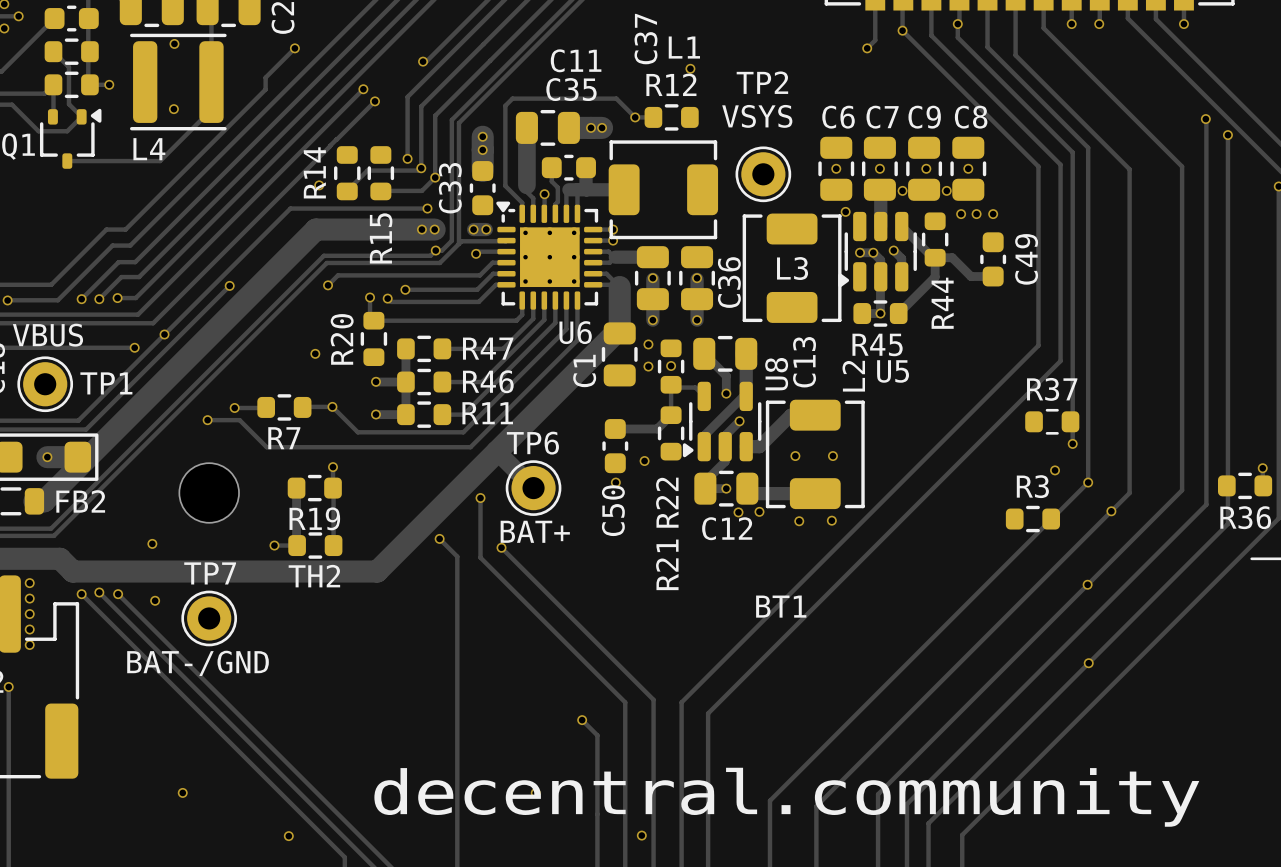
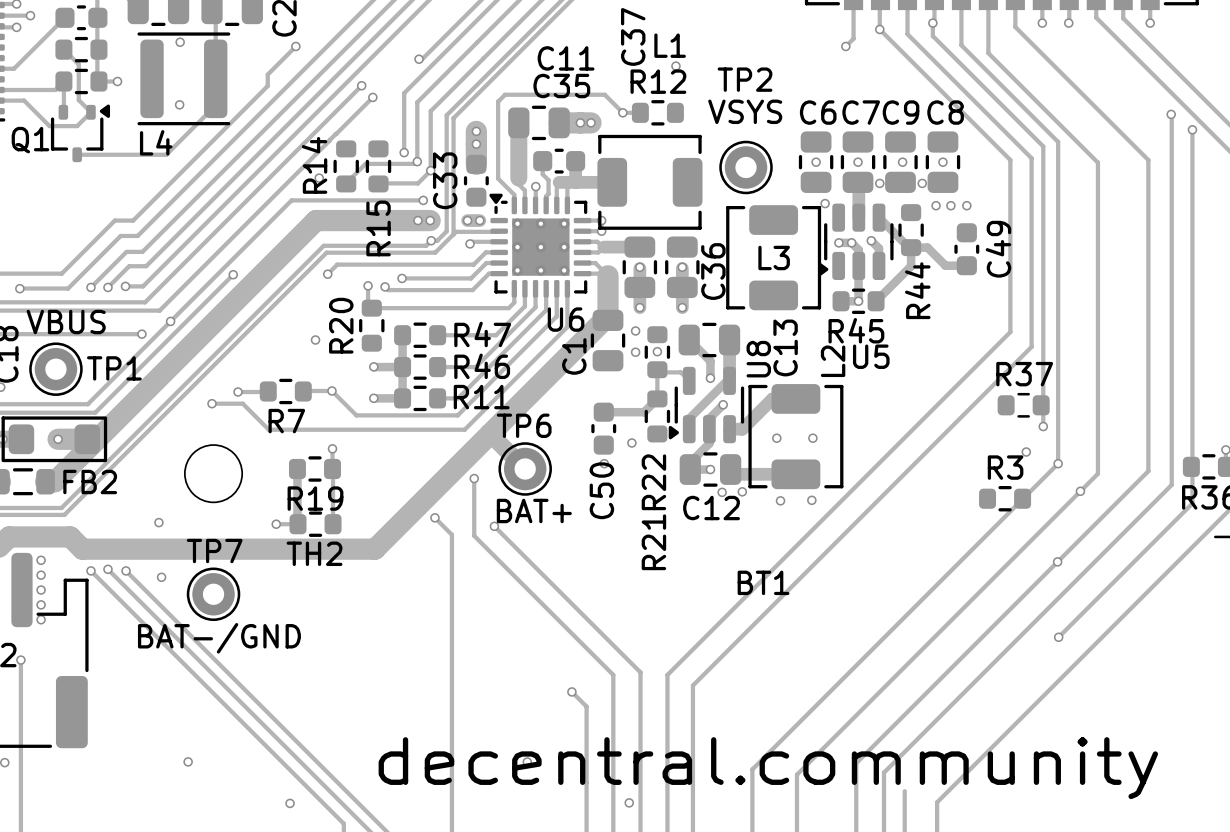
track: (1088, 663) (928, 823) -> none

